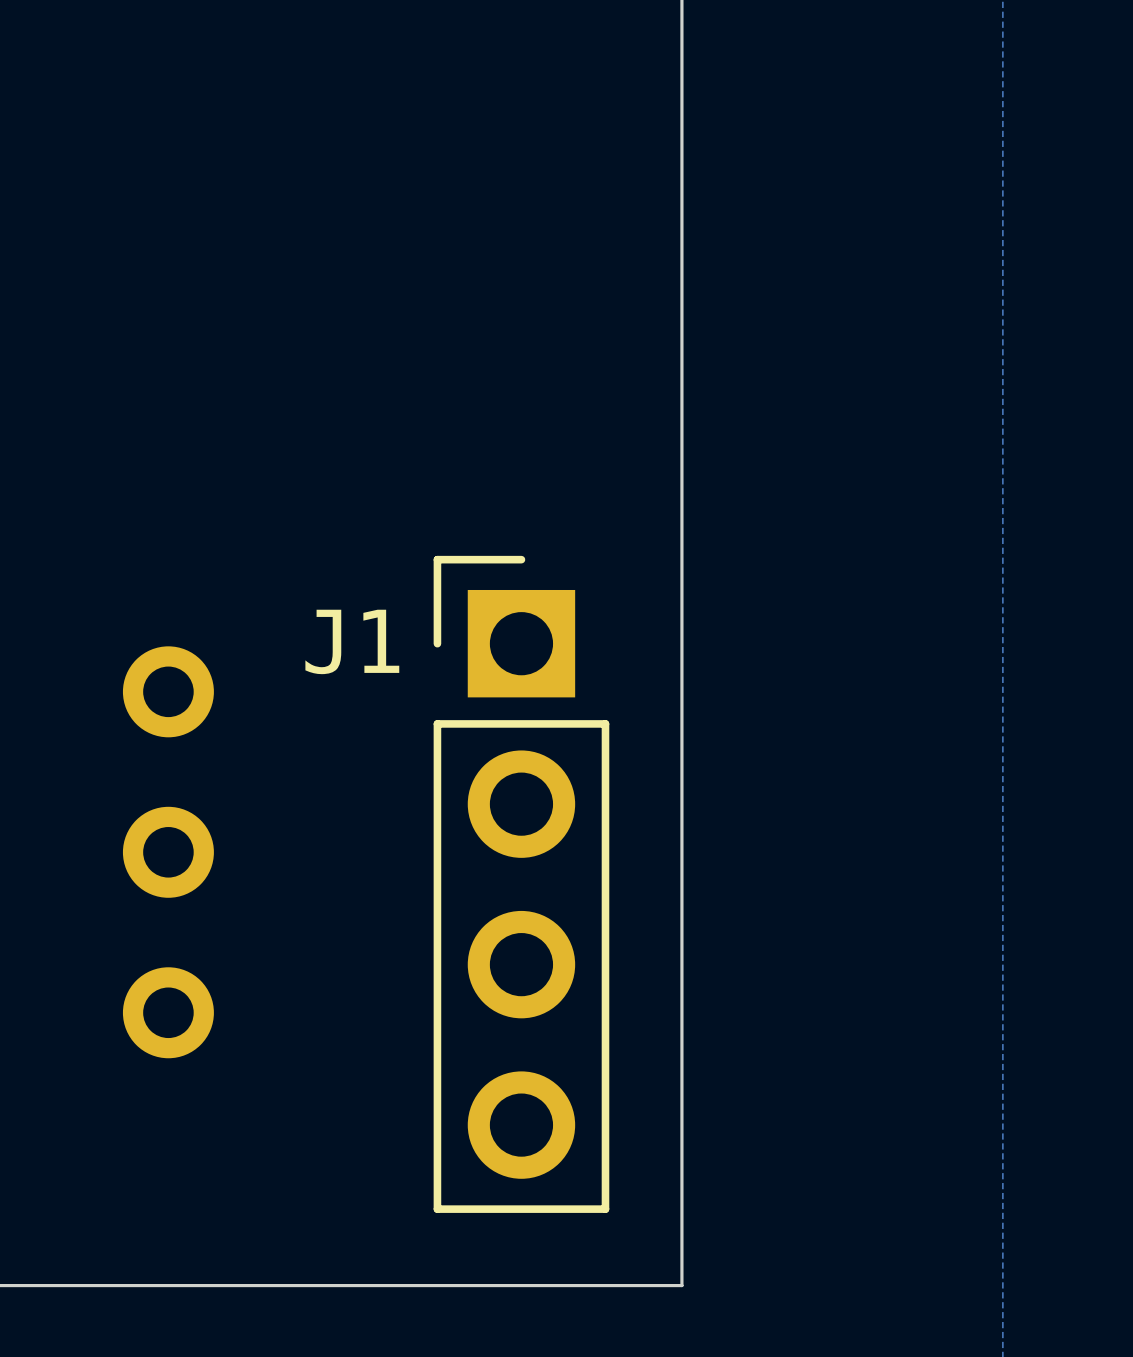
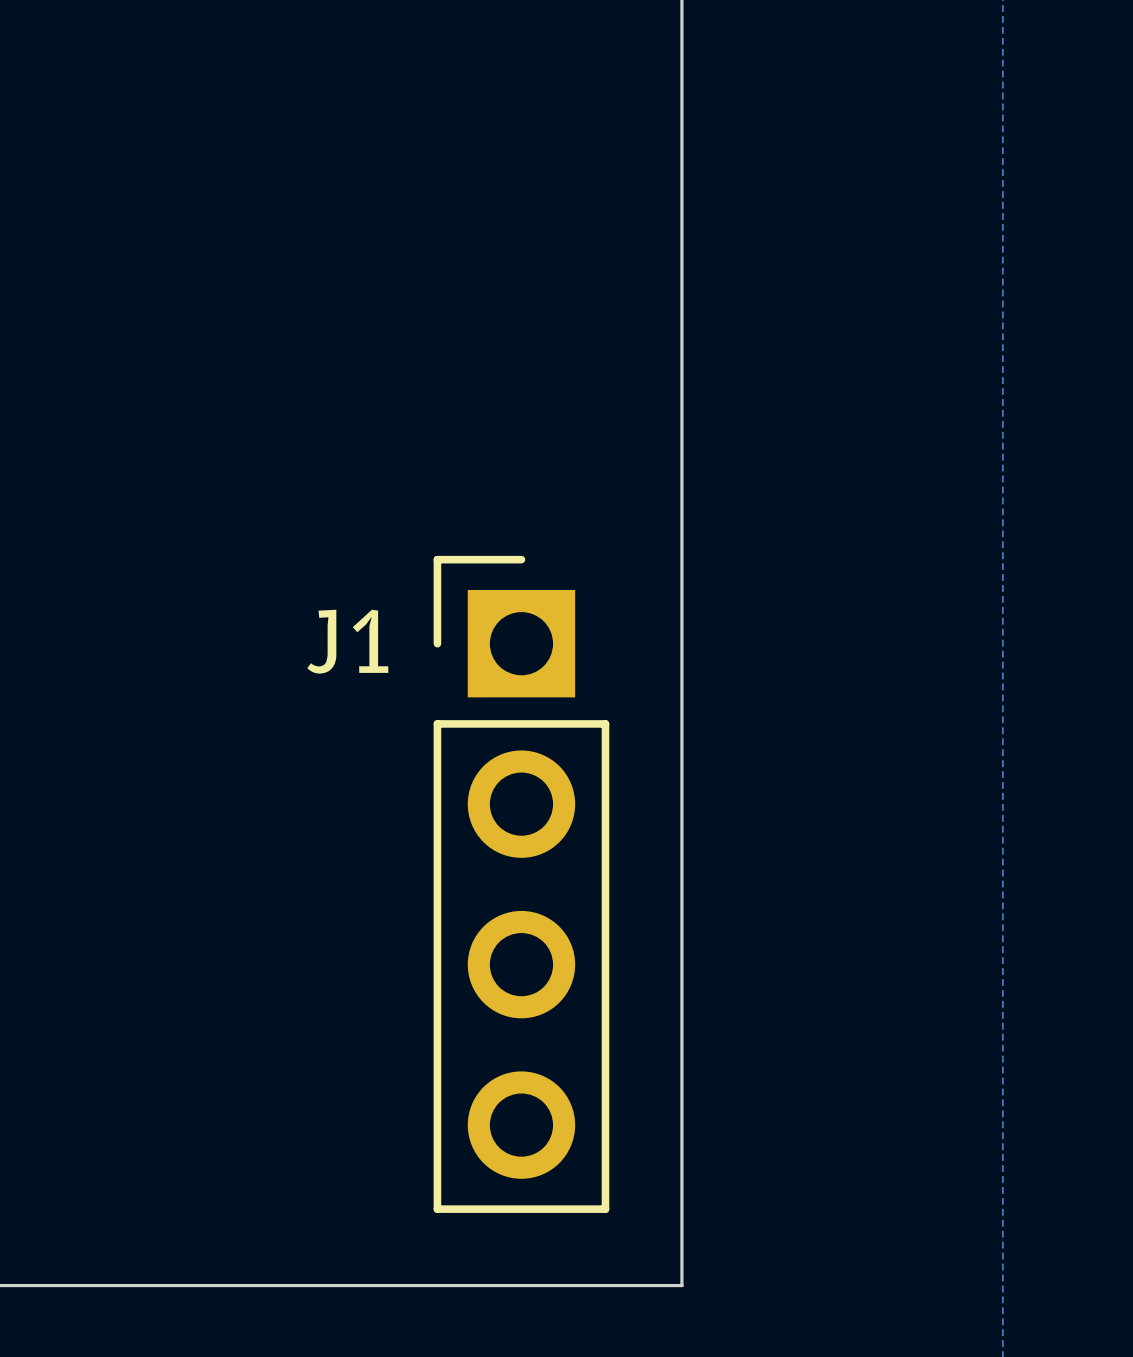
part: (168, 852) -> none

